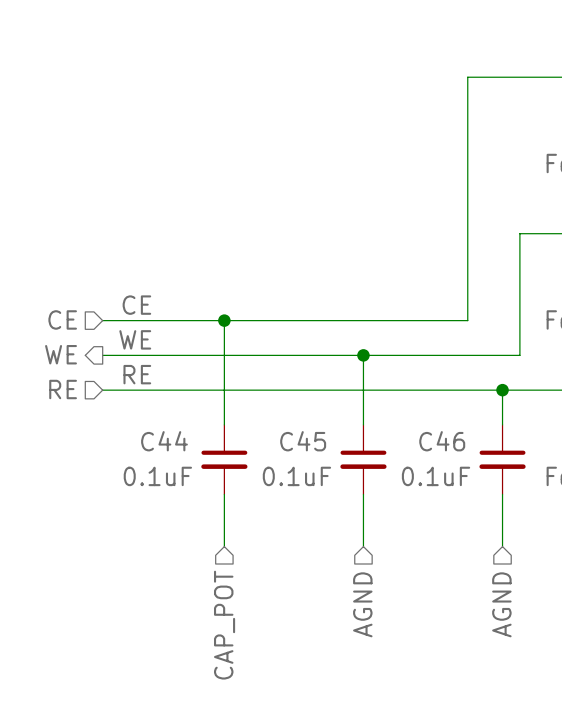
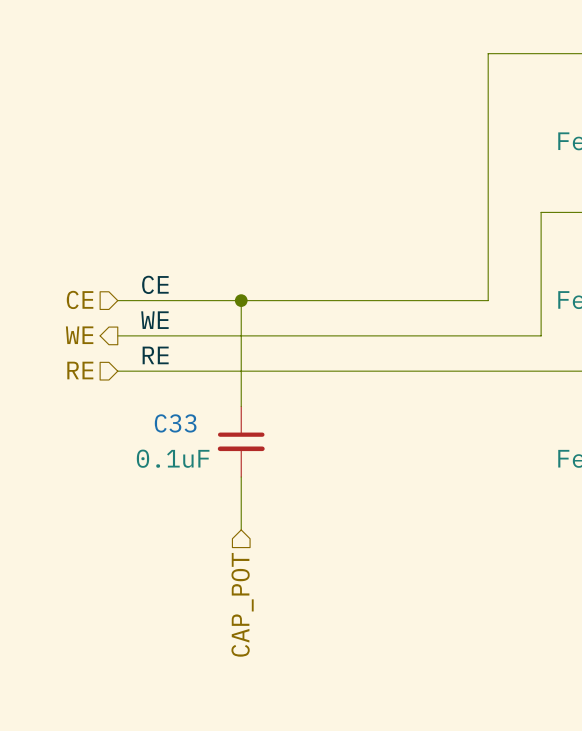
wire: (363, 355) (363, 424) -> none
junction: (363, 355) -> none
wire: (502, 390) (502, 424) -> none
junction: (502, 390) -> none
C44 name: C44 (164, 441) -> C33 (175, 423)
C45: 0.1uF (363, 459) -> none
C46: 0.1uF (502, 459) -> none
wire: (363, 494) (363, 546) -> none
wire: (502, 494) (502, 546) -> none
hierarchical label: AGND (362, 604) -> none
hierarchical label: AGND (501, 604) -> none

